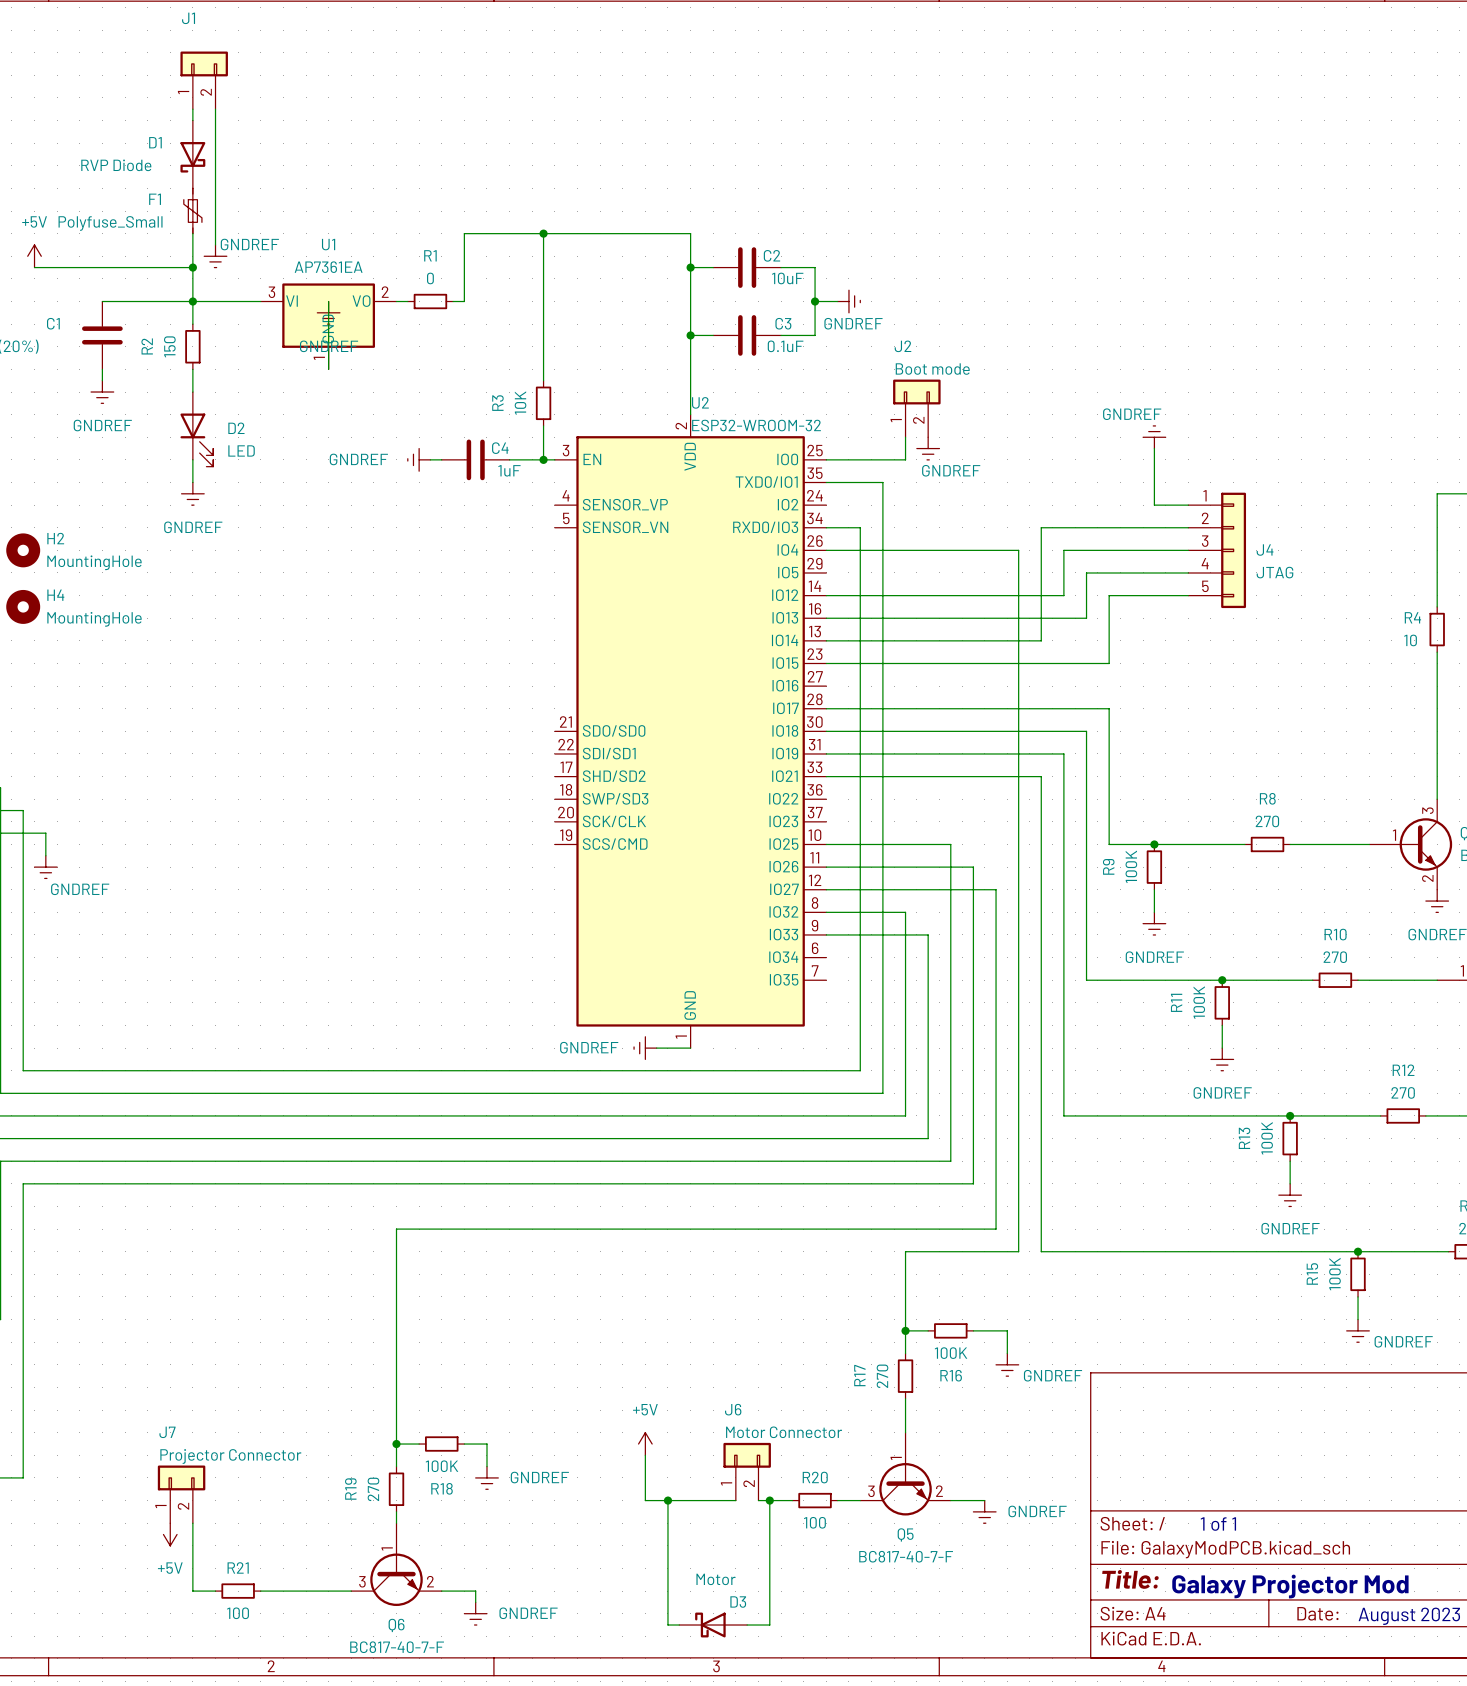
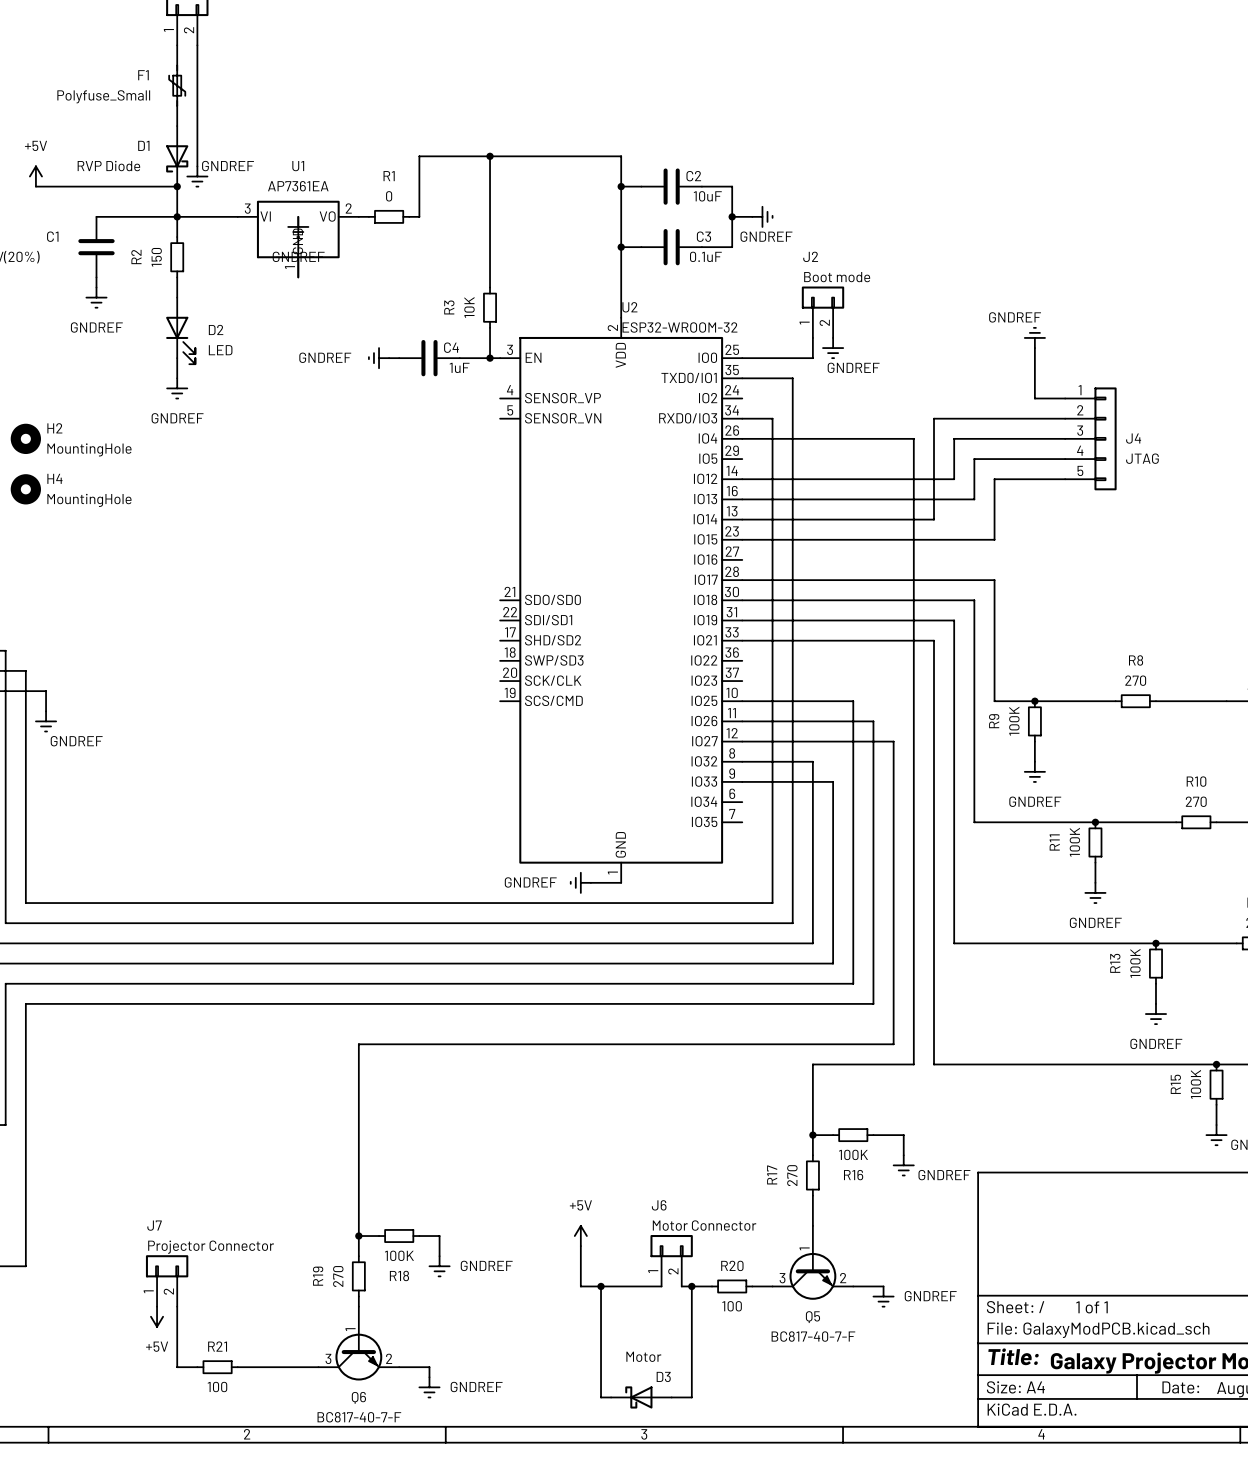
D1 position: (192, 154) -> (177, 156)
F1 position: (192, 211) -> (177, 85)

